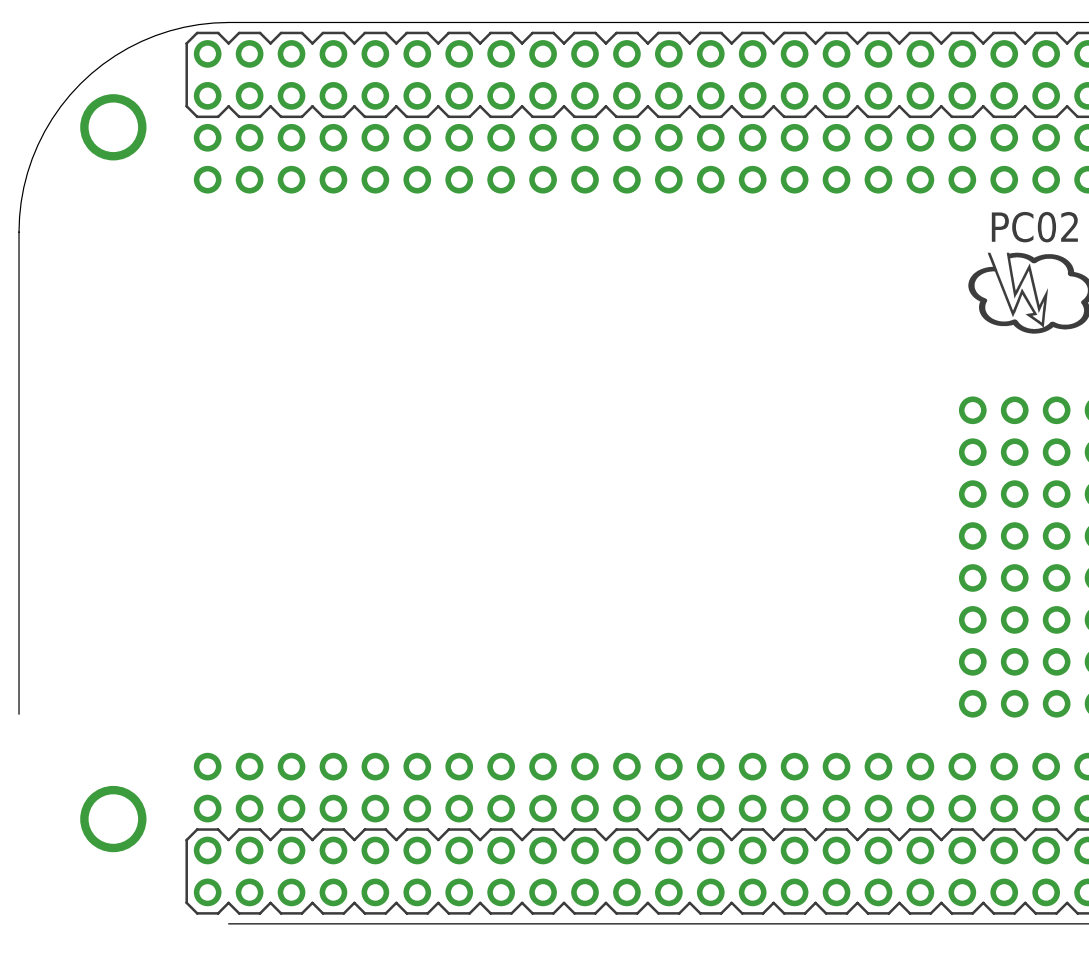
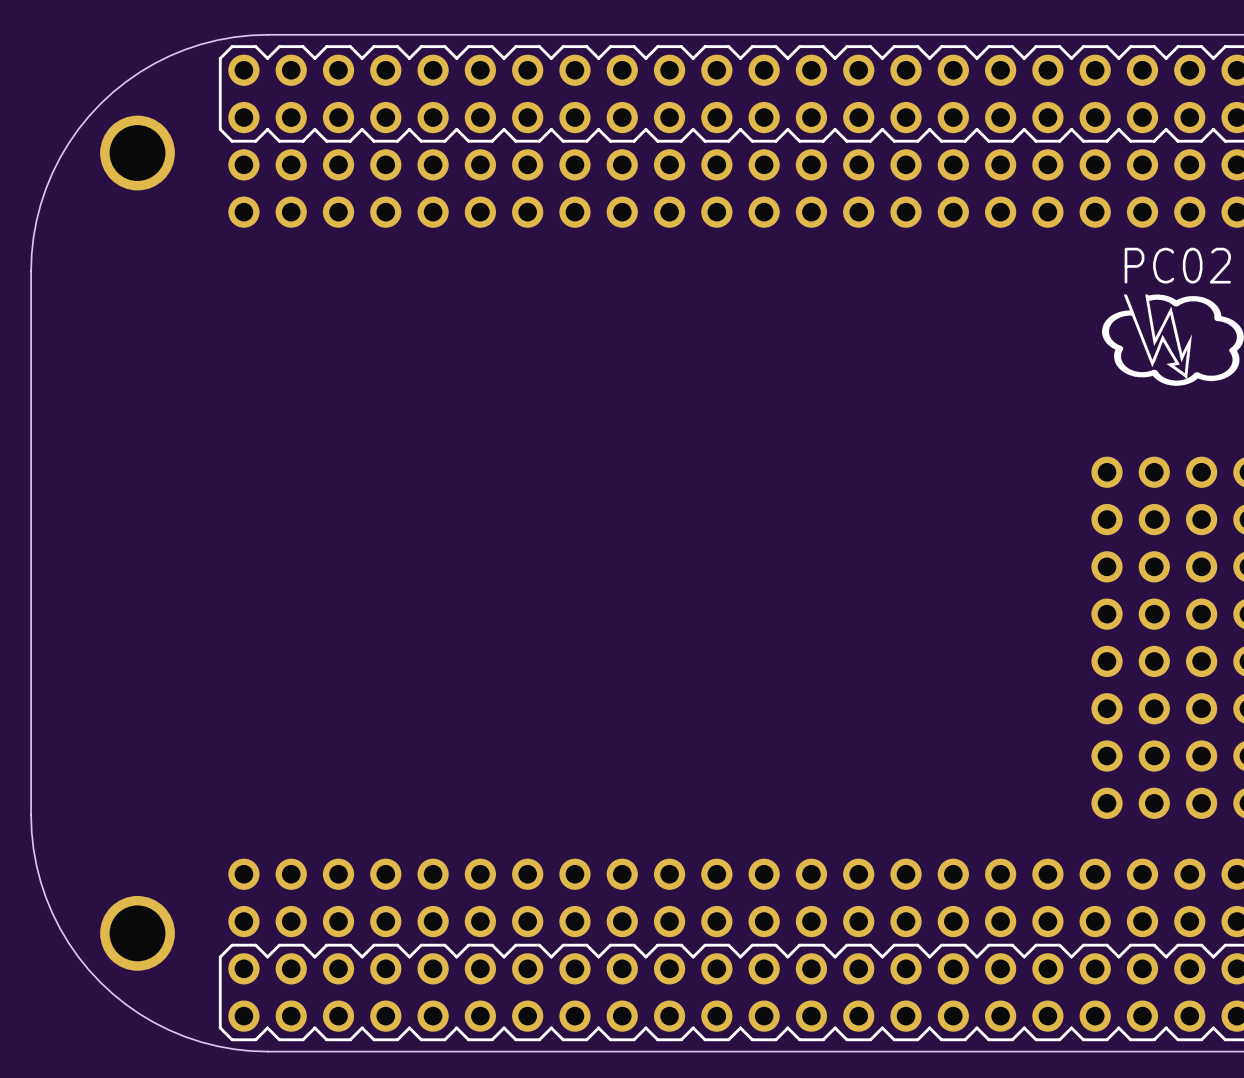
board edge: none -> (31, 815) (36, 865) (46, 897) (68, 942) (100, 982) (139, 1014) (184, 1036) (217, 1046) (267, 1051)

